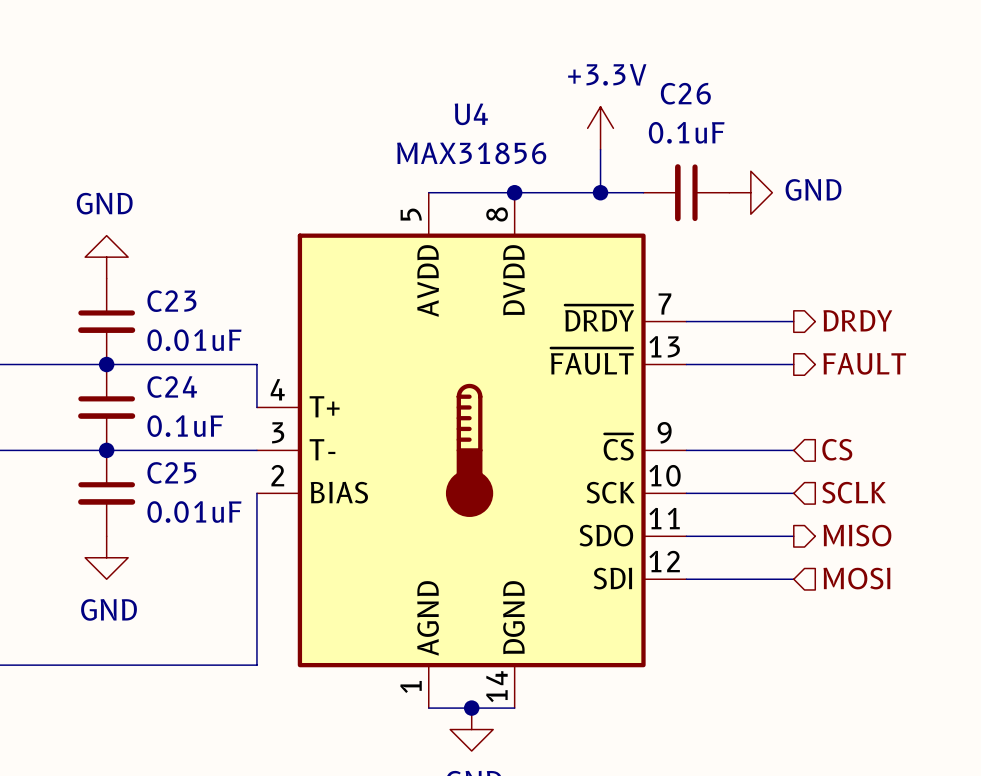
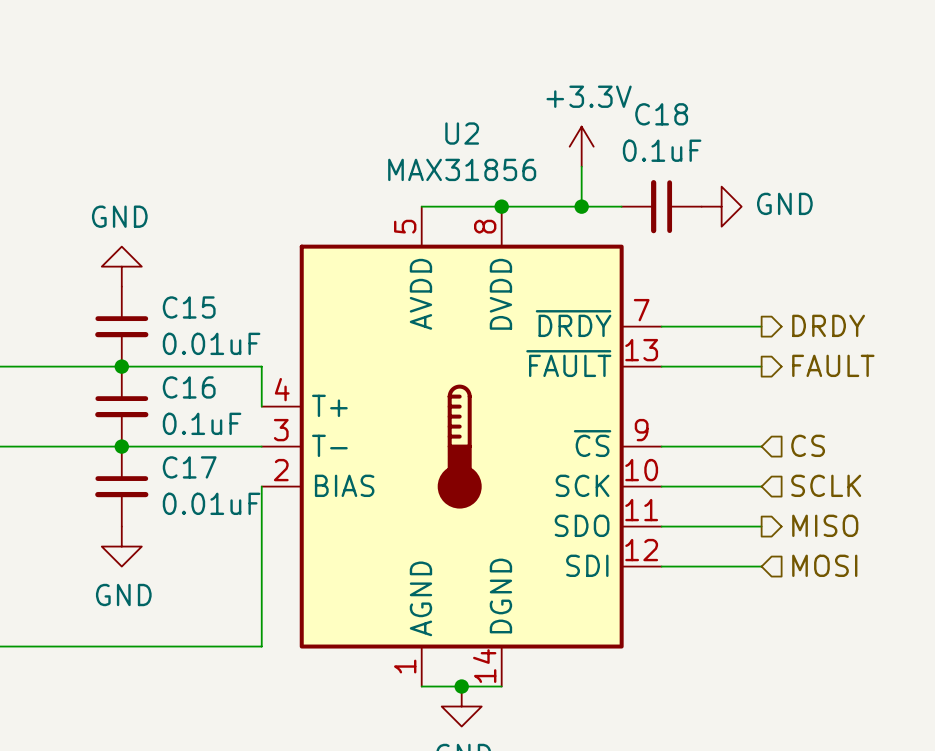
C26 name: C26 (685, 93) -> C18 (661, 114)
U4 name: U4 (471, 114) -> U2 (462, 133)
C23 name: C23 (171, 301) -> C15 (189, 307)
C24 name: C24 (172, 387) -> C16 (189, 387)
C25 name: C25 (171, 472) -> C17 (189, 467)

